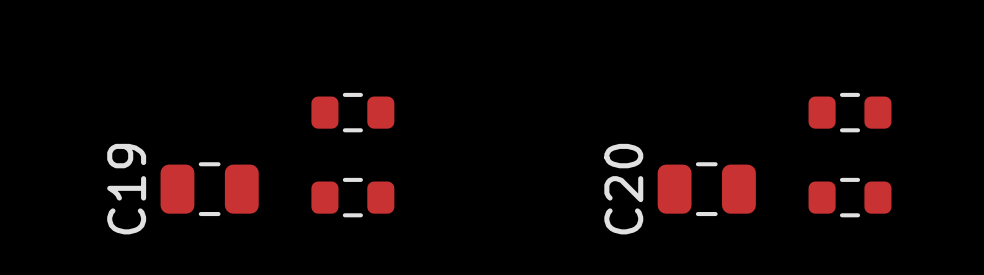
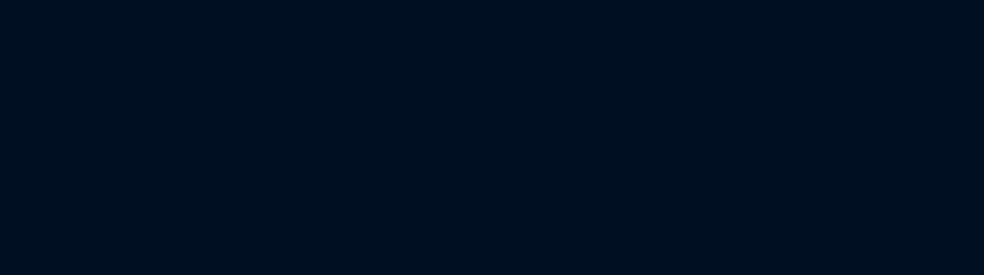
part: (352, 112) -> none
part: (850, 112) -> none
C19: (209, 189) -> none
C20: (706, 189) -> none
part: (352, 197) -> none
part: (850, 197) -> none

